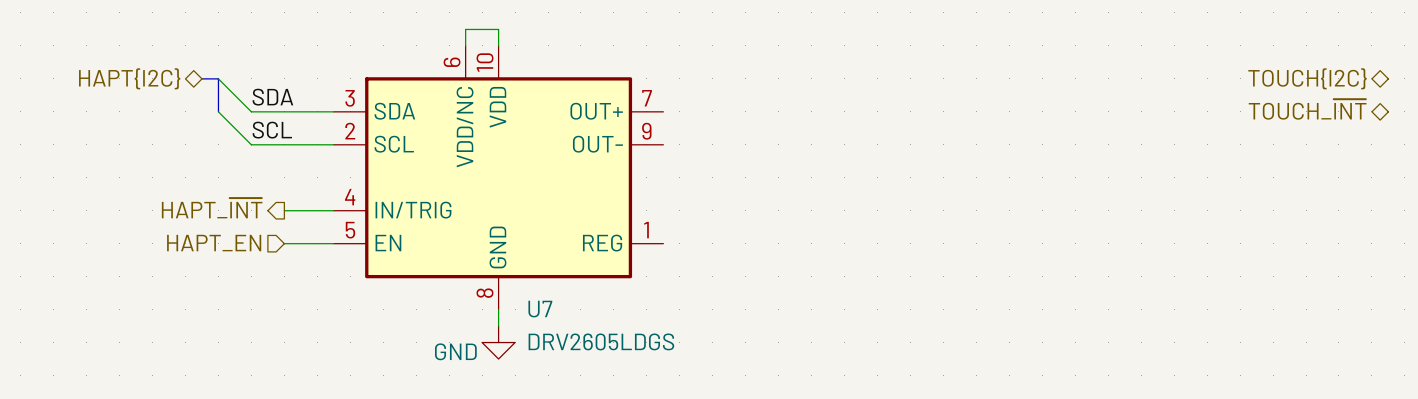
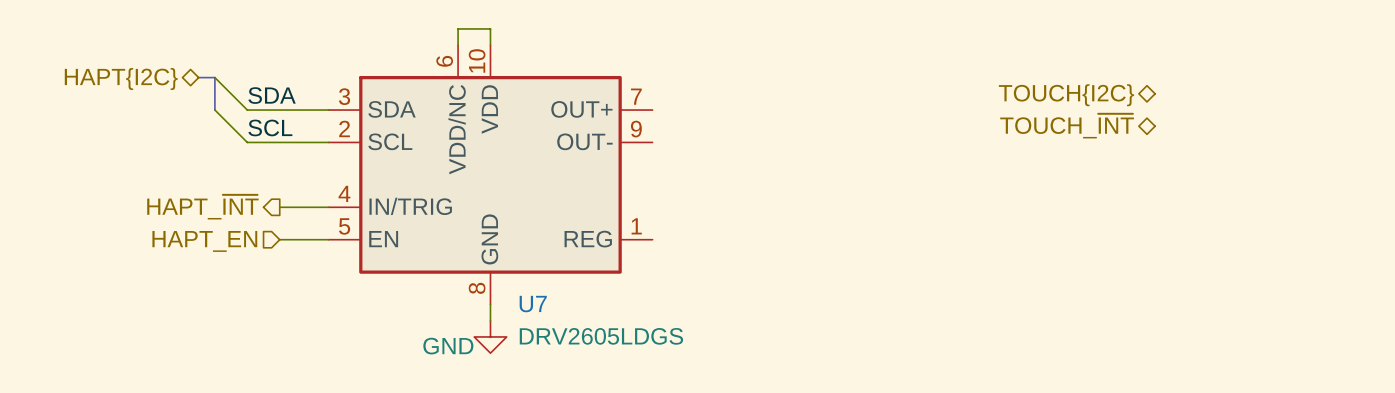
hierarchical label position: TOUCH{I2C} (1307, 78) -> TOUCH{I2C} (1066, 95)
hierarchical label position: TOUCH_~{INT} (1307, 109) -> TOUCH_~{INT} (1067, 126)

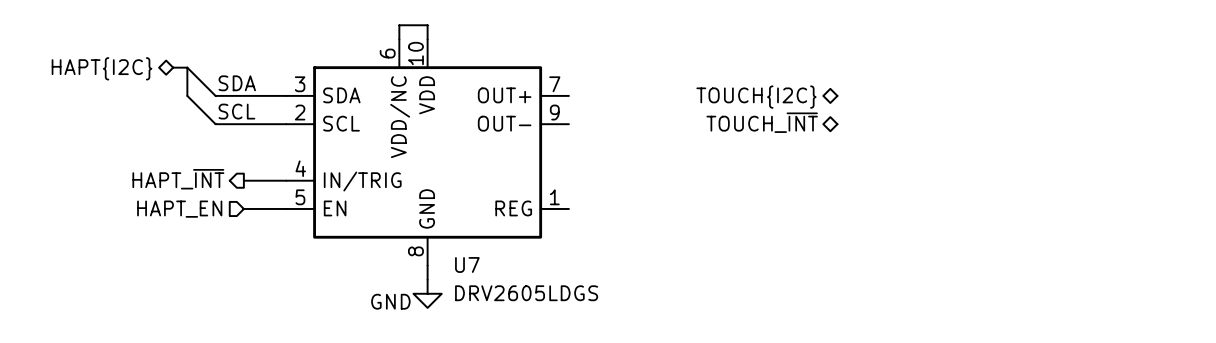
hierarchical label position: TOUCH{I2C} (1066, 95) -> TOUCH{I2C} (756, 97)
hierarchical label position: TOUCH_~{INT} (1067, 126) -> TOUCH_~{INT} (762, 122)

